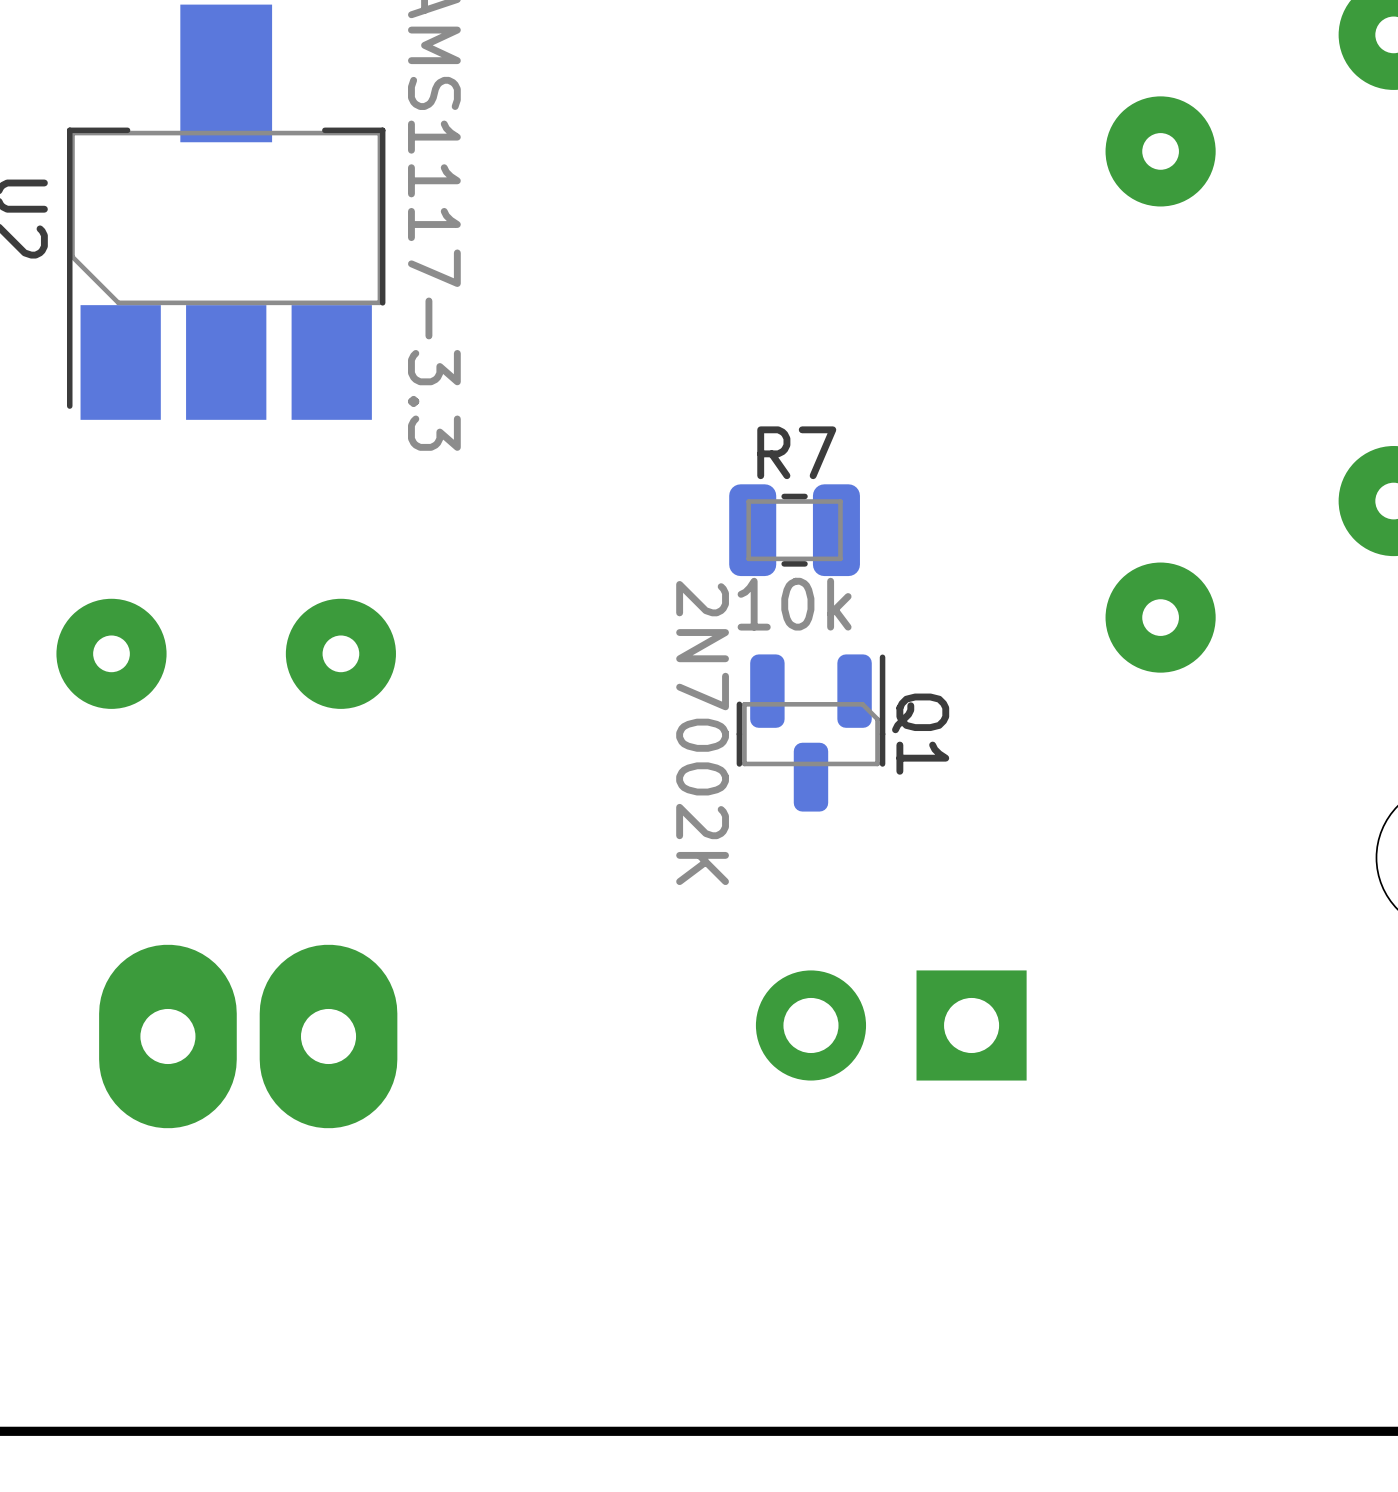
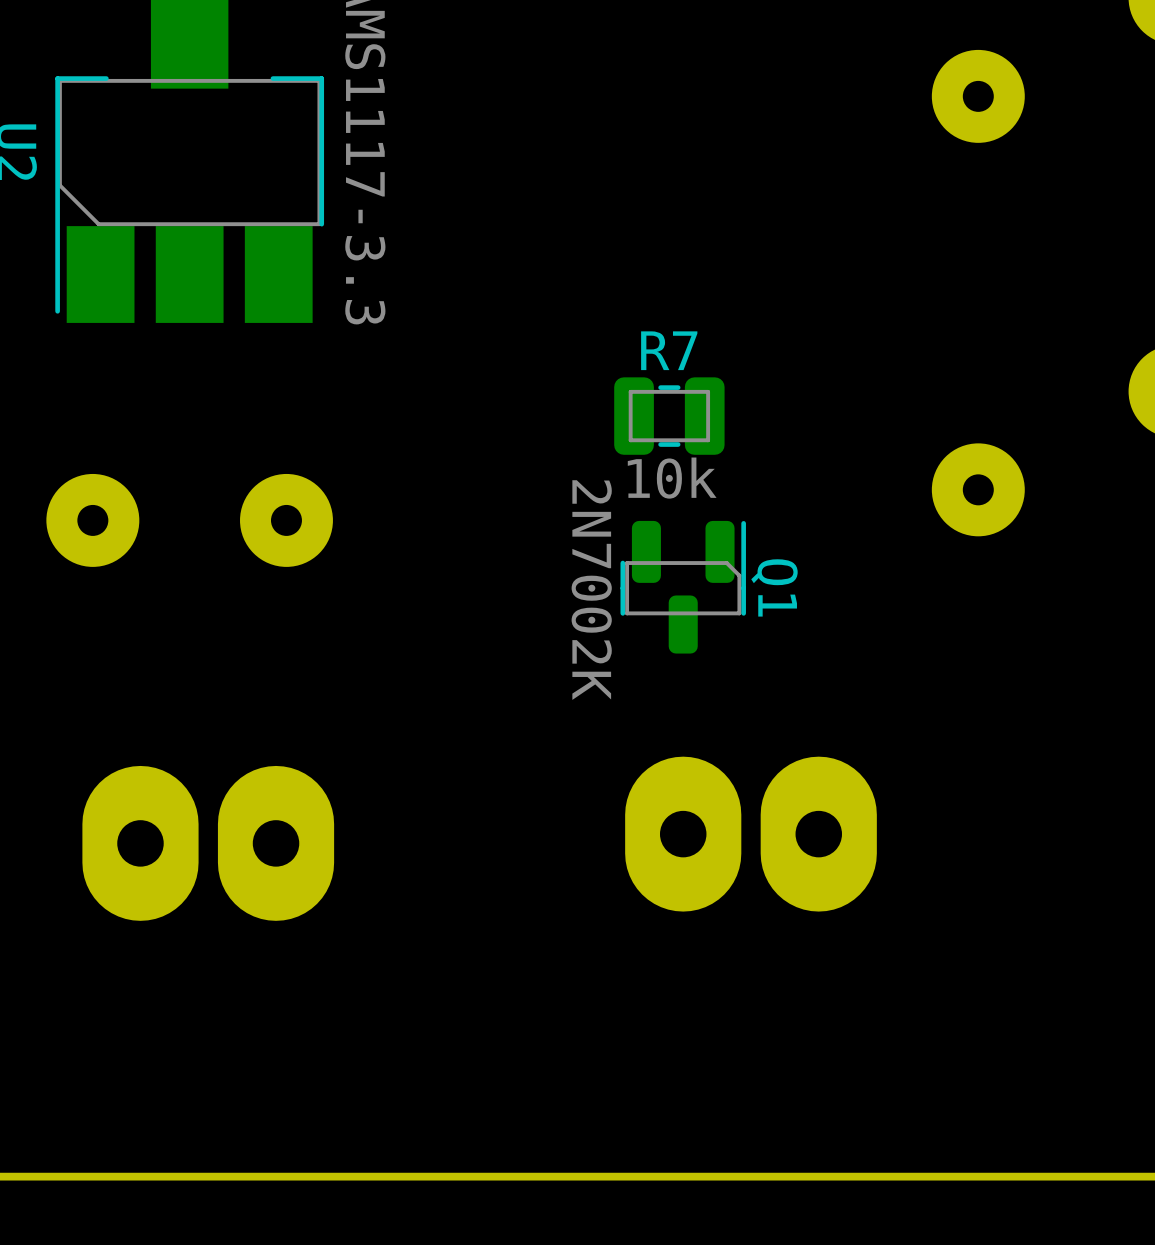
part footprint: [755, 970, 1027, 1081] -> [625, 756, 877, 912]

